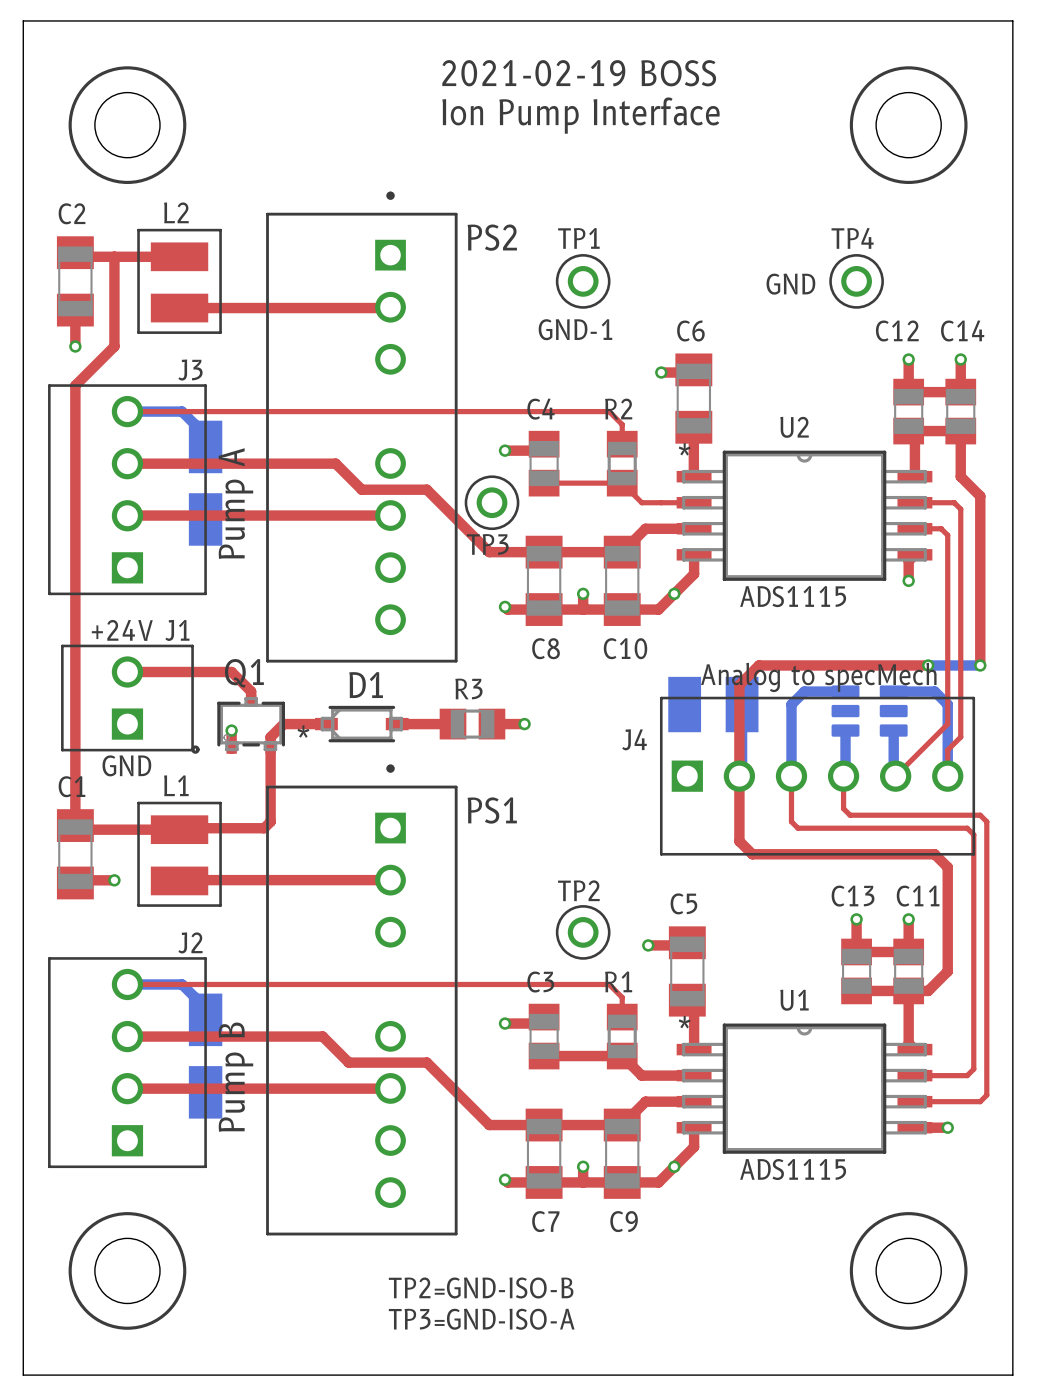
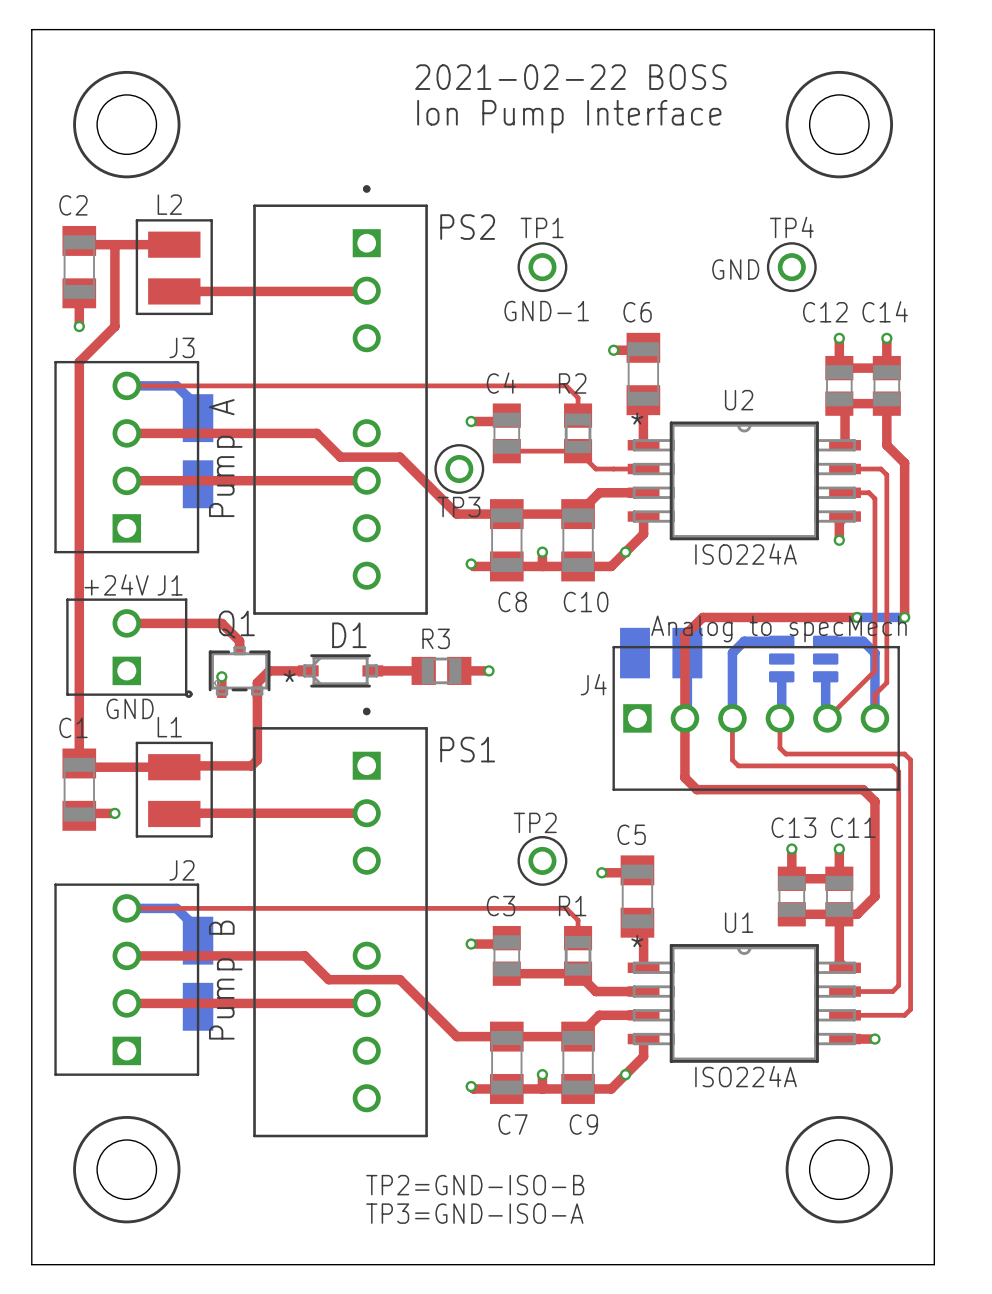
text: 2021-02-19 BOSS (579, 73) -> 2021-02-22 BOSS (570, 77)
text: ADS1115 (793, 596) -> ISO224A (746, 554)
text: ADS1115 (793, 1169) -> ISO224A (746, 1076)

